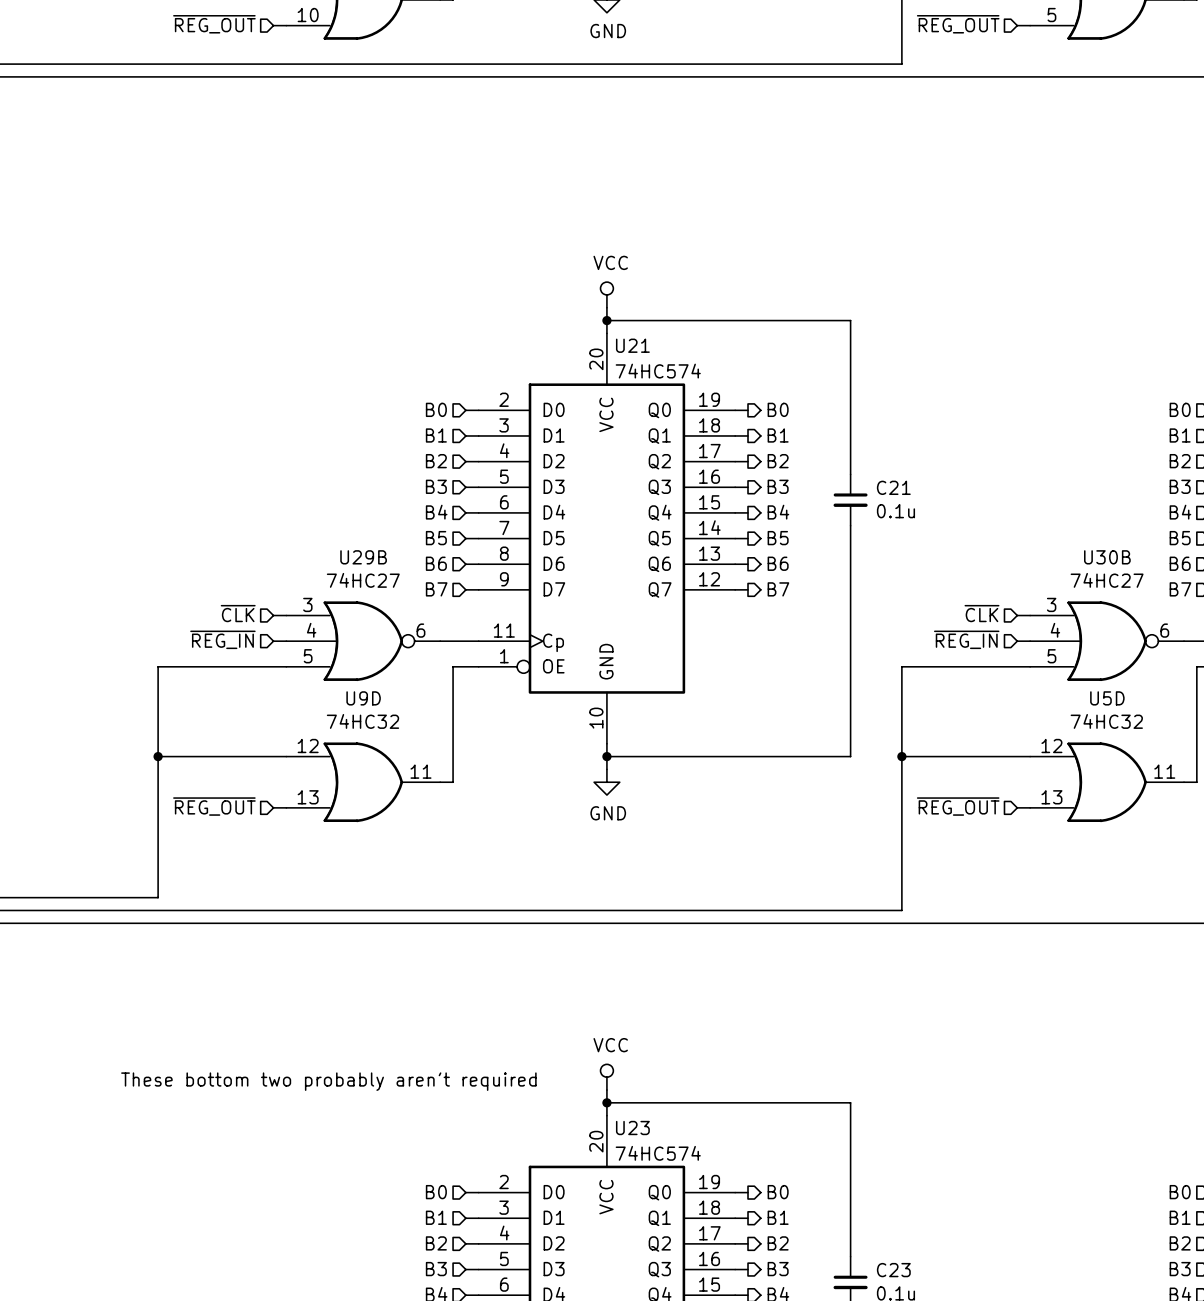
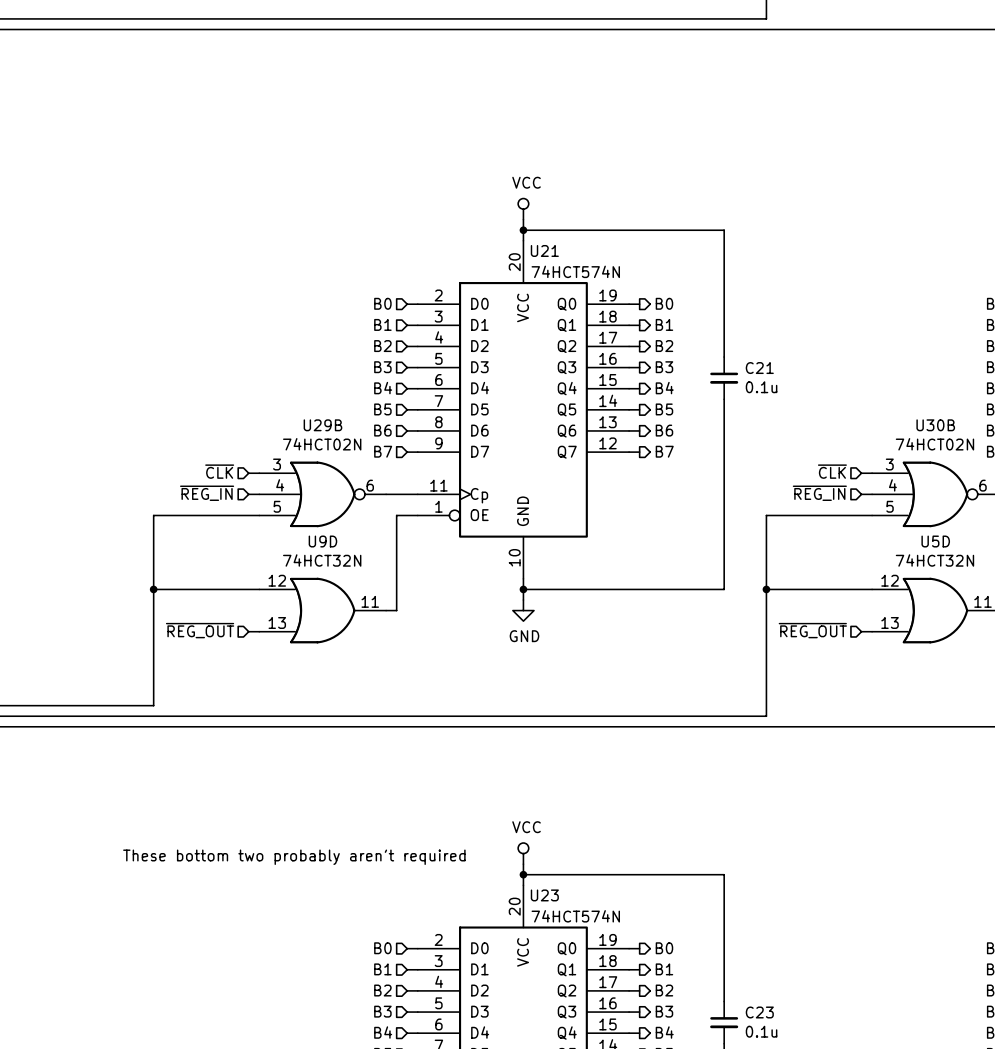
U21 value: 74HC574 (658, 371) -> 74HCT574N (575, 271)
U29B value: 74HC27 (363, 580) -> 74HCT02N (322, 444)
U30B value: 74HC27 (1107, 580) -> 74HCT02N (934, 444)
U9D value: 74HC32 (362, 721) -> 74HCT32N (322, 560)
U5D value: 74HC32 (1106, 721) -> 74HCT32N (934, 560)
U23 value: 74HC574 (658, 1153) -> 74HCT574N (575, 916)

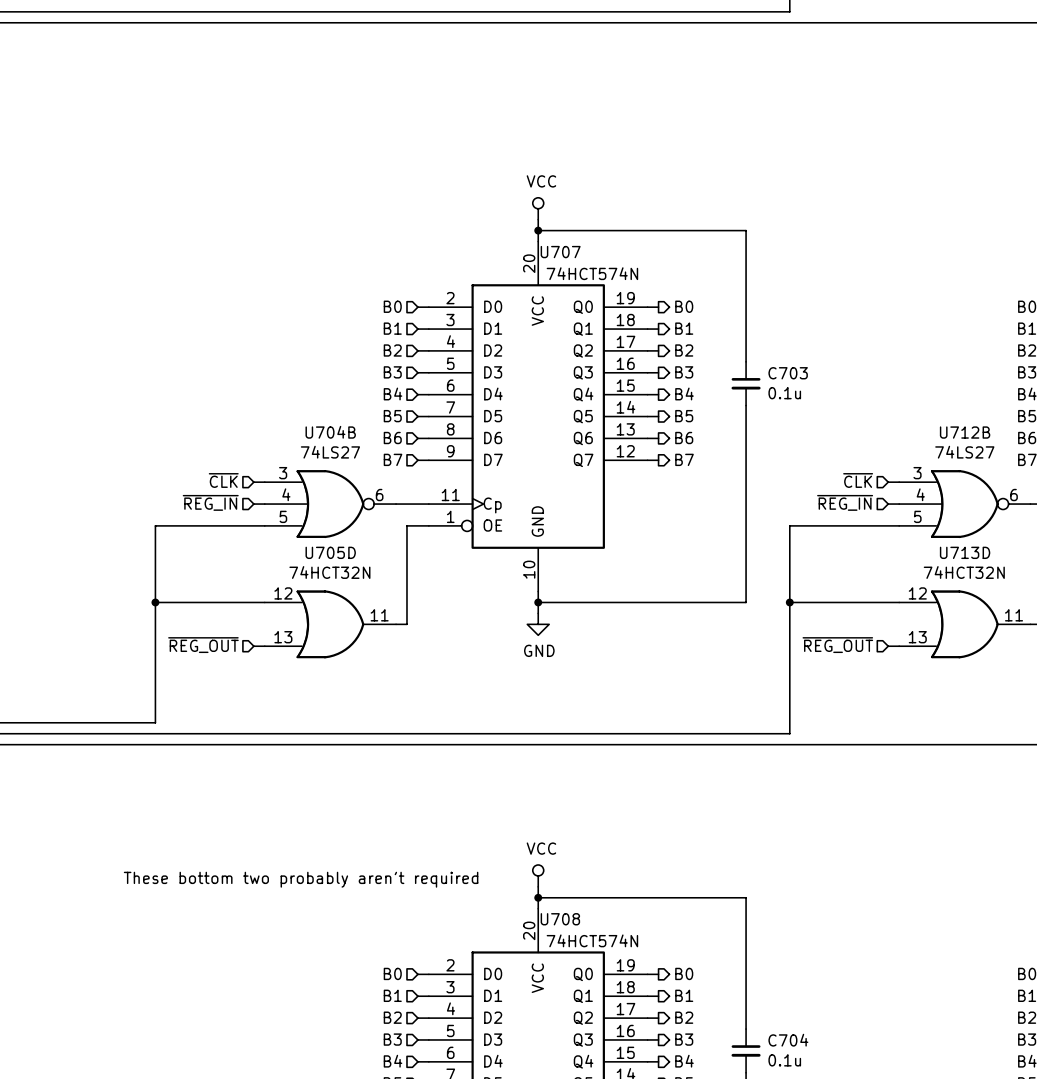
U21 name: U21 (544, 250) -> U707 (560, 252)
C21 name: C21 (759, 368) -> C703 (788, 373)
U29B name: U29B (322, 425) -> U704B (330, 432)
U30B name: U30B (935, 425) -> U712B (965, 432)
U29B value: 74HCT02N (322, 444) -> 74LS27 (330, 452)
U30B value: 74HCT02N (934, 444) -> 74LS27 (964, 452)
U9D name: U9D (322, 541) -> U705D (330, 552)
U5D name: U5D (935, 541) -> U713D (965, 552)
U23 name: U23 (544, 895) -> U708 (560, 919)
C23 name: C23 (759, 1012) -> C704 (788, 1040)

